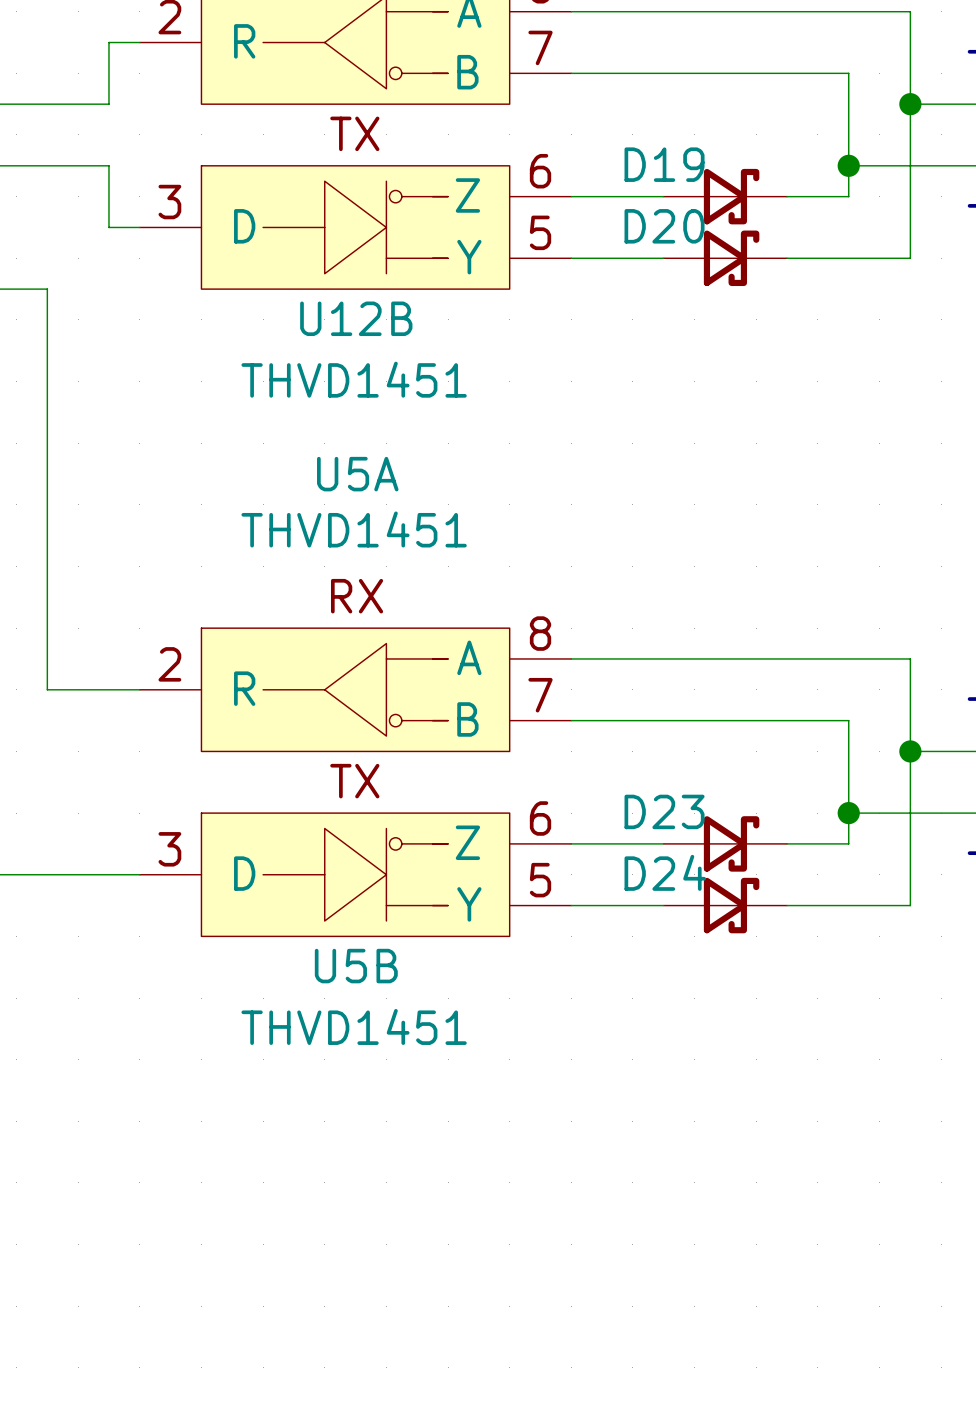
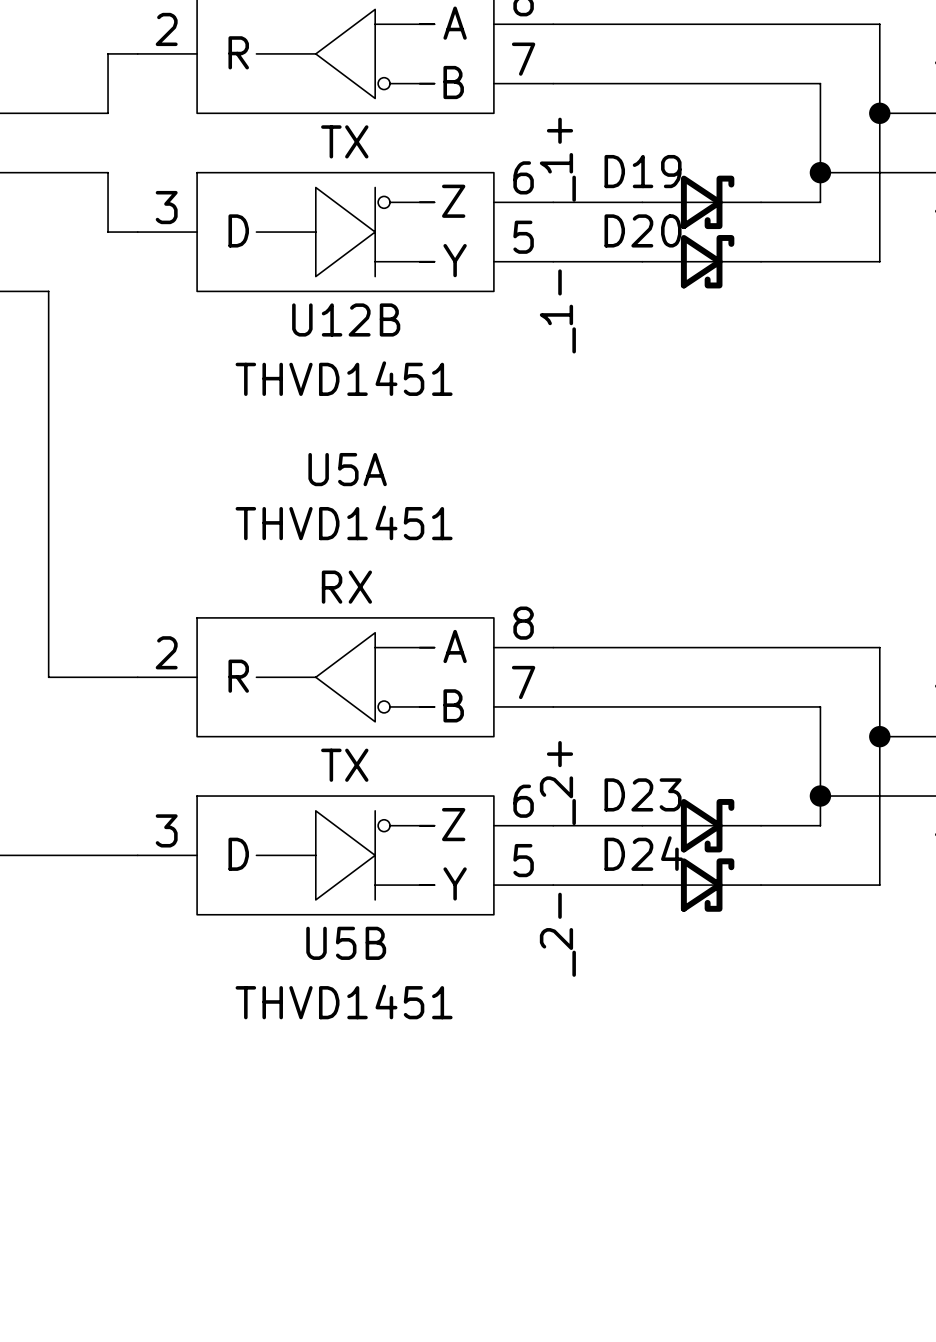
label: none -> _1+ (557, 159)
label: none -> _1- (557, 311)
label: none -> _2+ (557, 783)
label: none -> _2- (557, 934)

